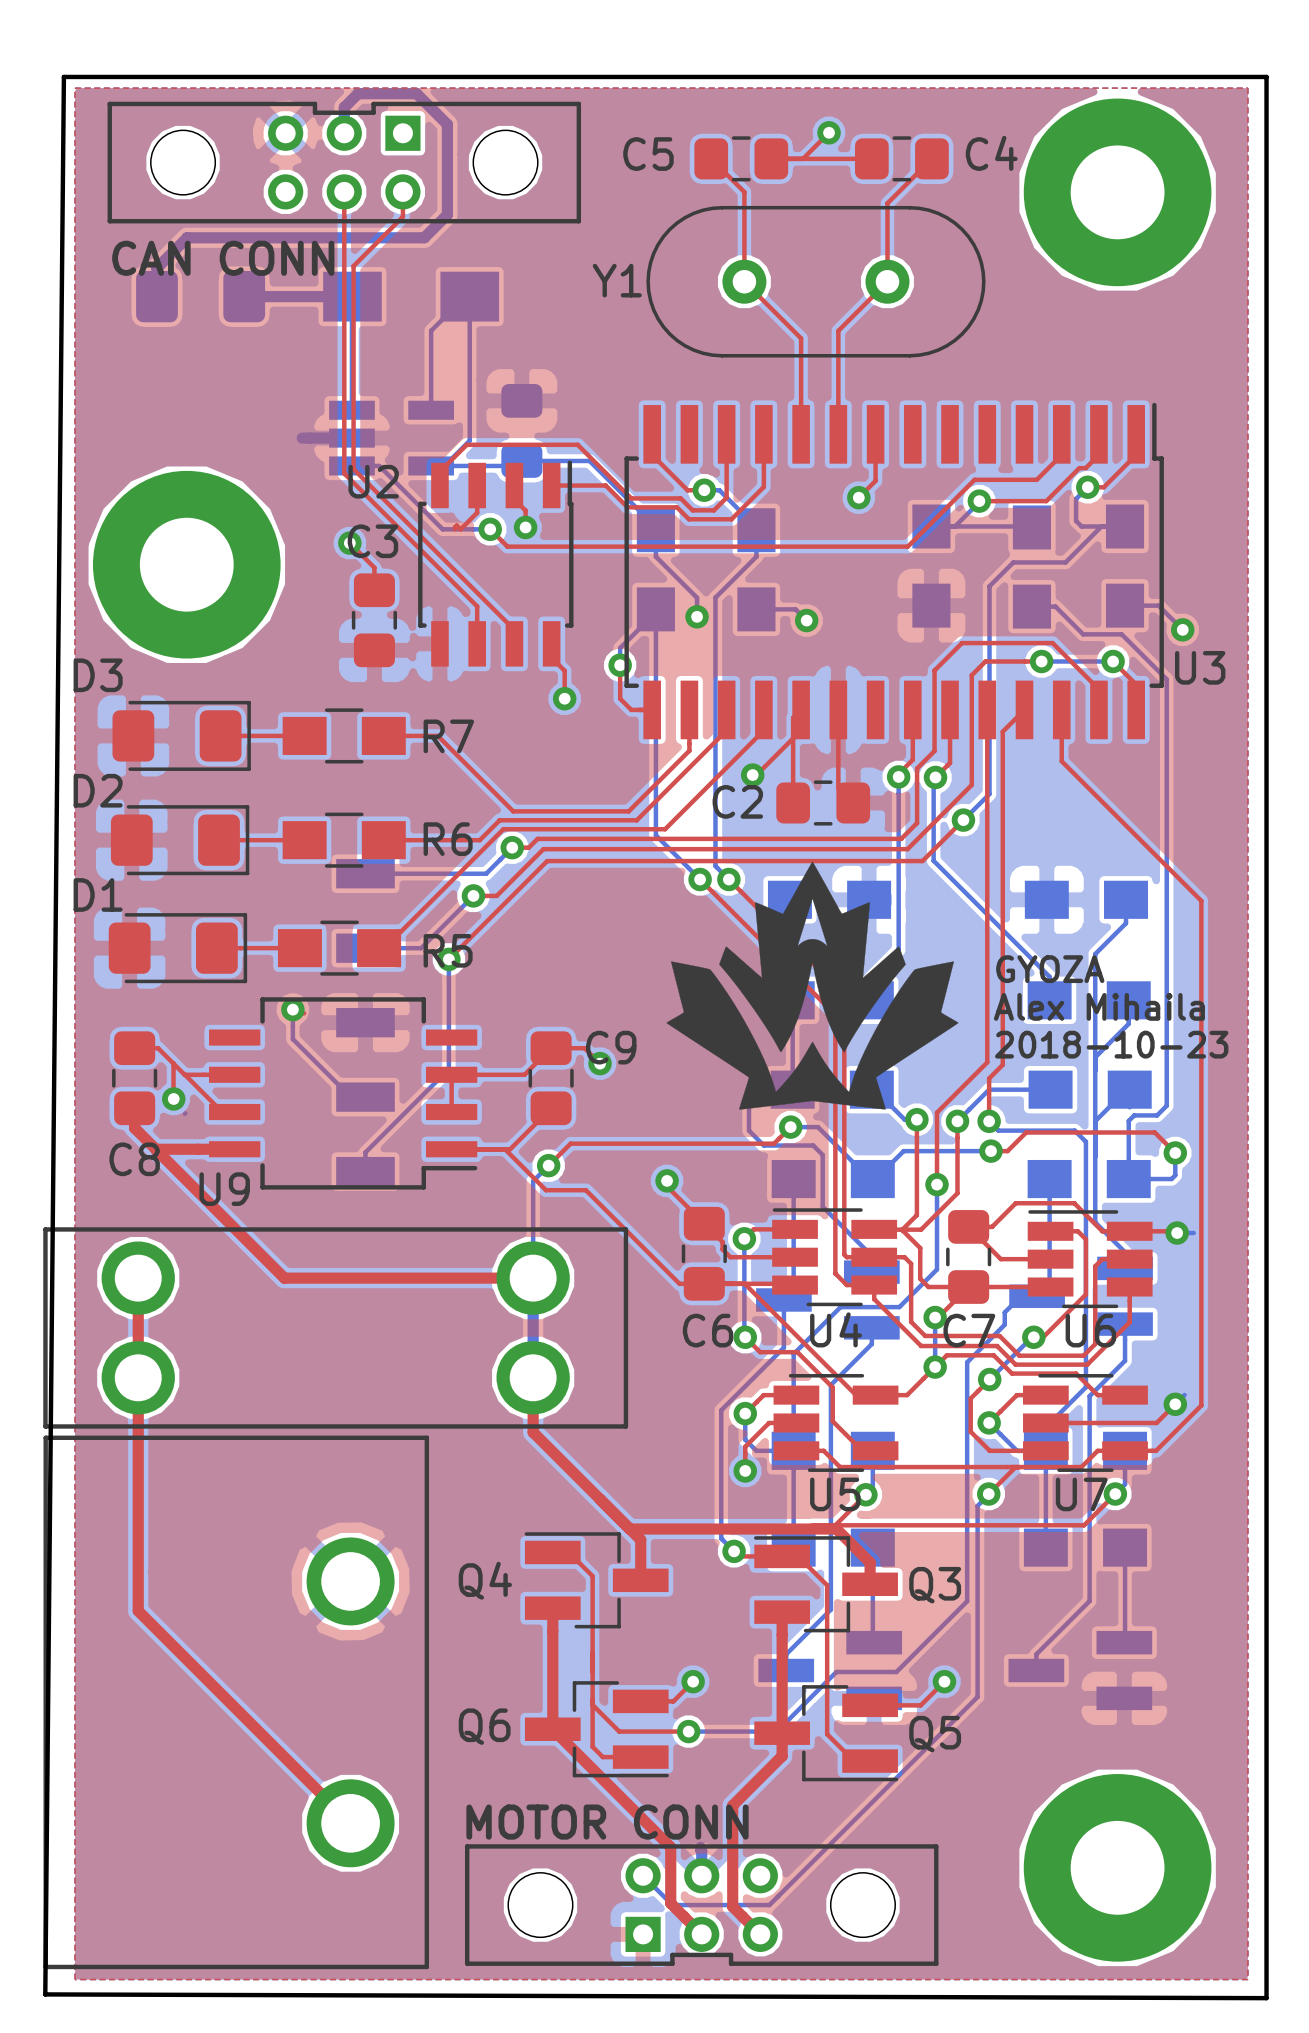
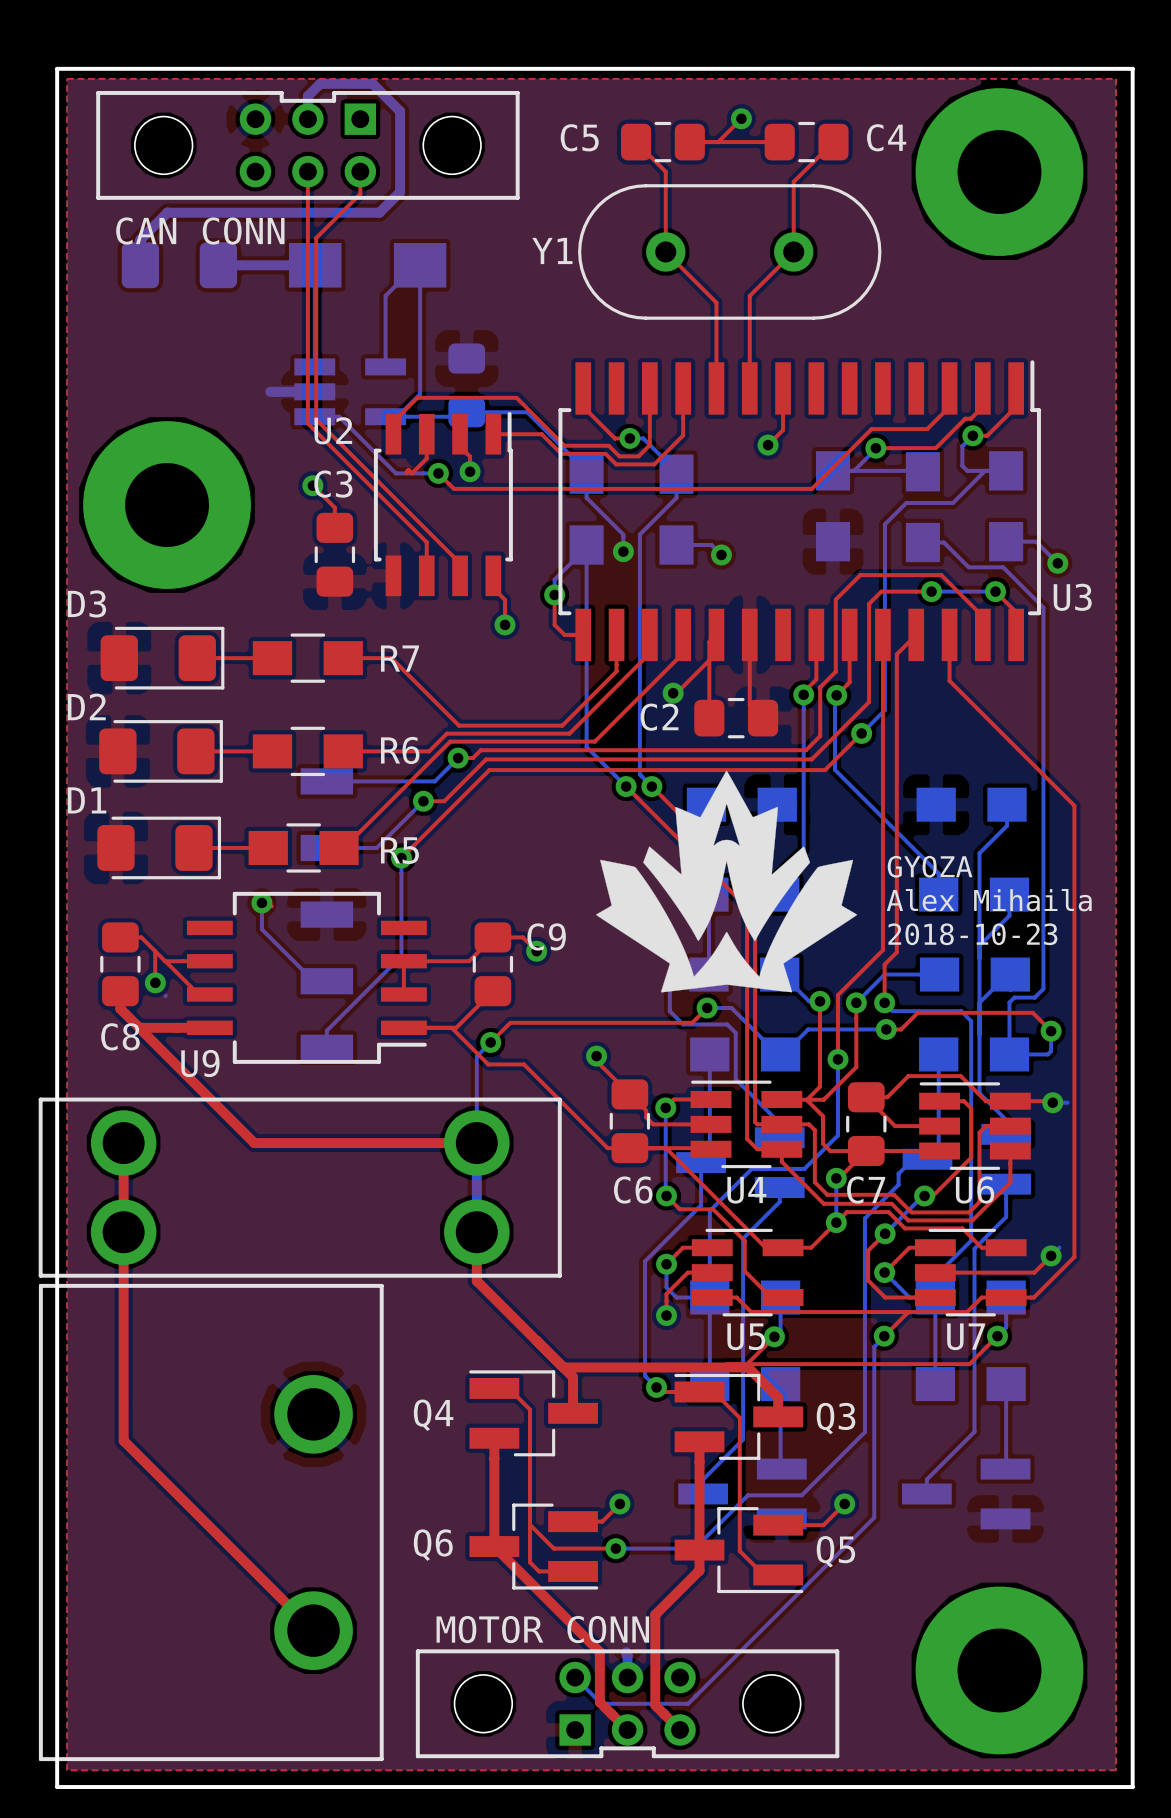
board edge: (63, 76) (45, 1994) (1266, 1998) -> (57, 68) (57, 1787) (1132, 1787)

